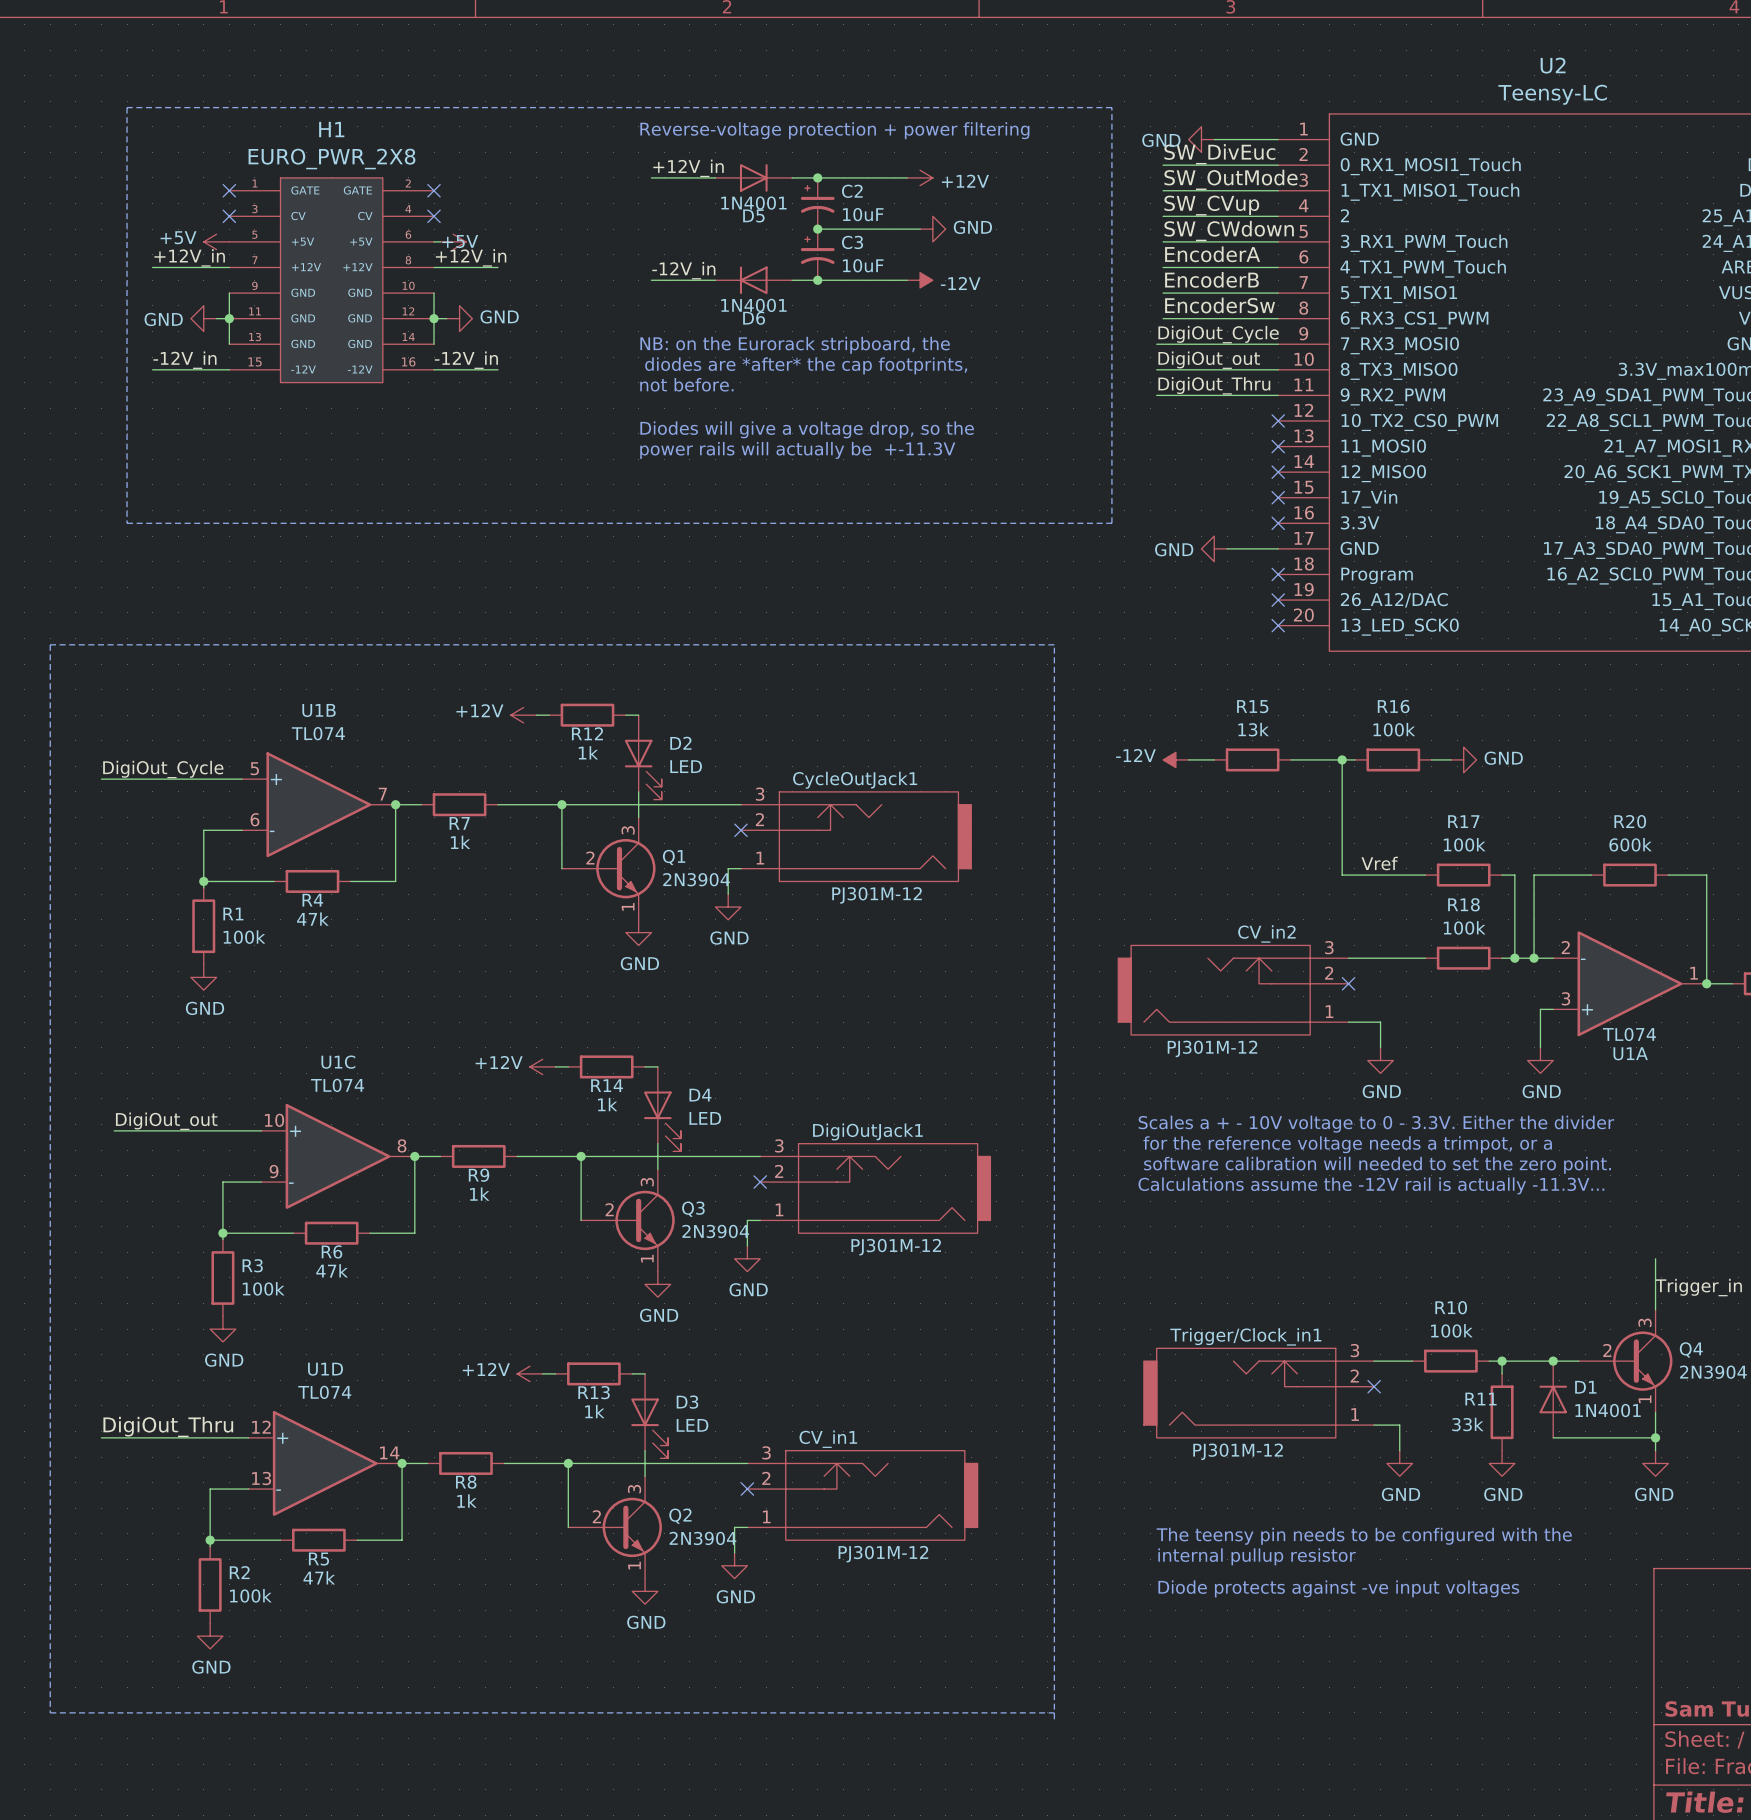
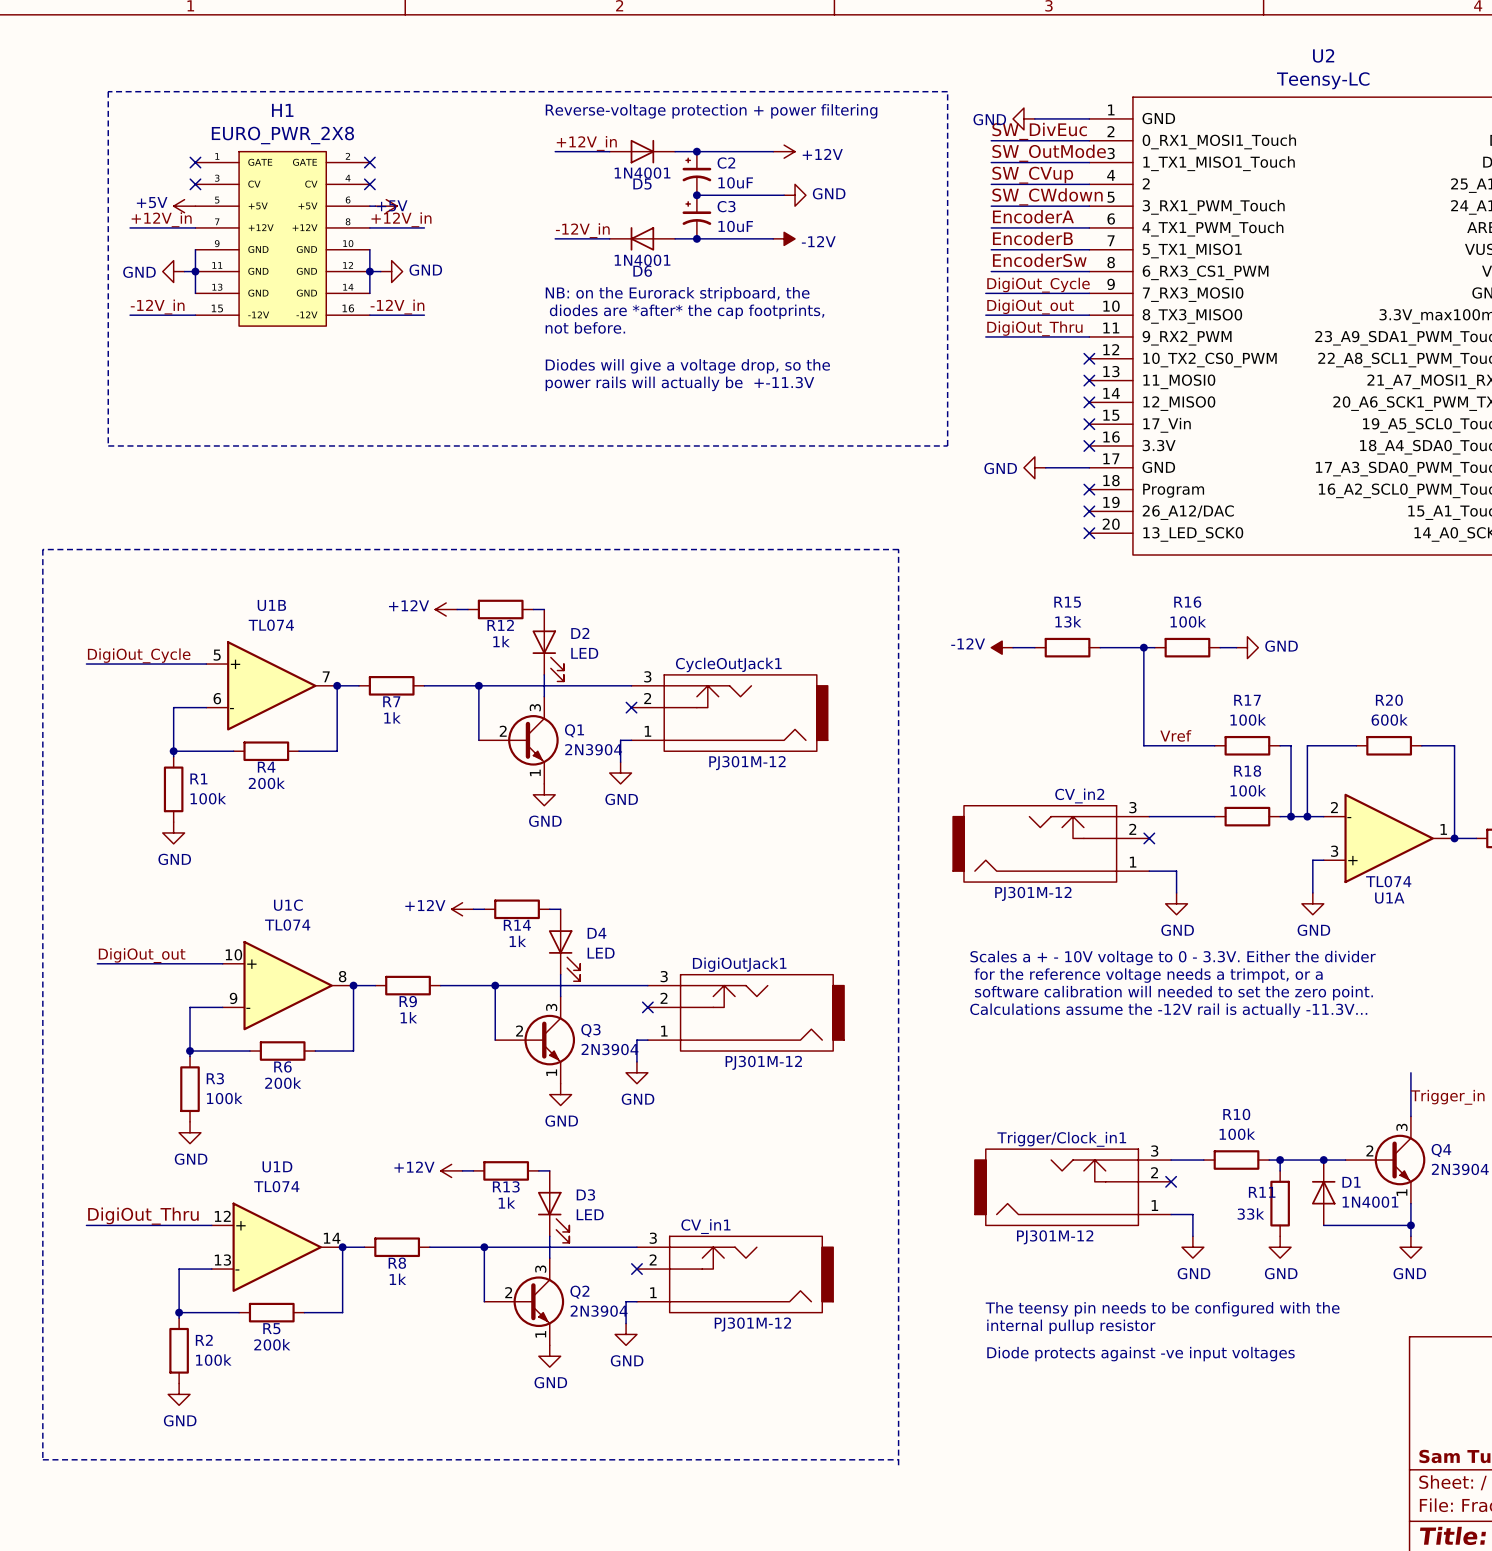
R4 value: 47k (312, 919) -> 200k (266, 783)
R6 value: 47k (332, 1270) -> 200k (283, 1083)
R5 value: 47k (319, 1577) -> 200k (272, 1344)

